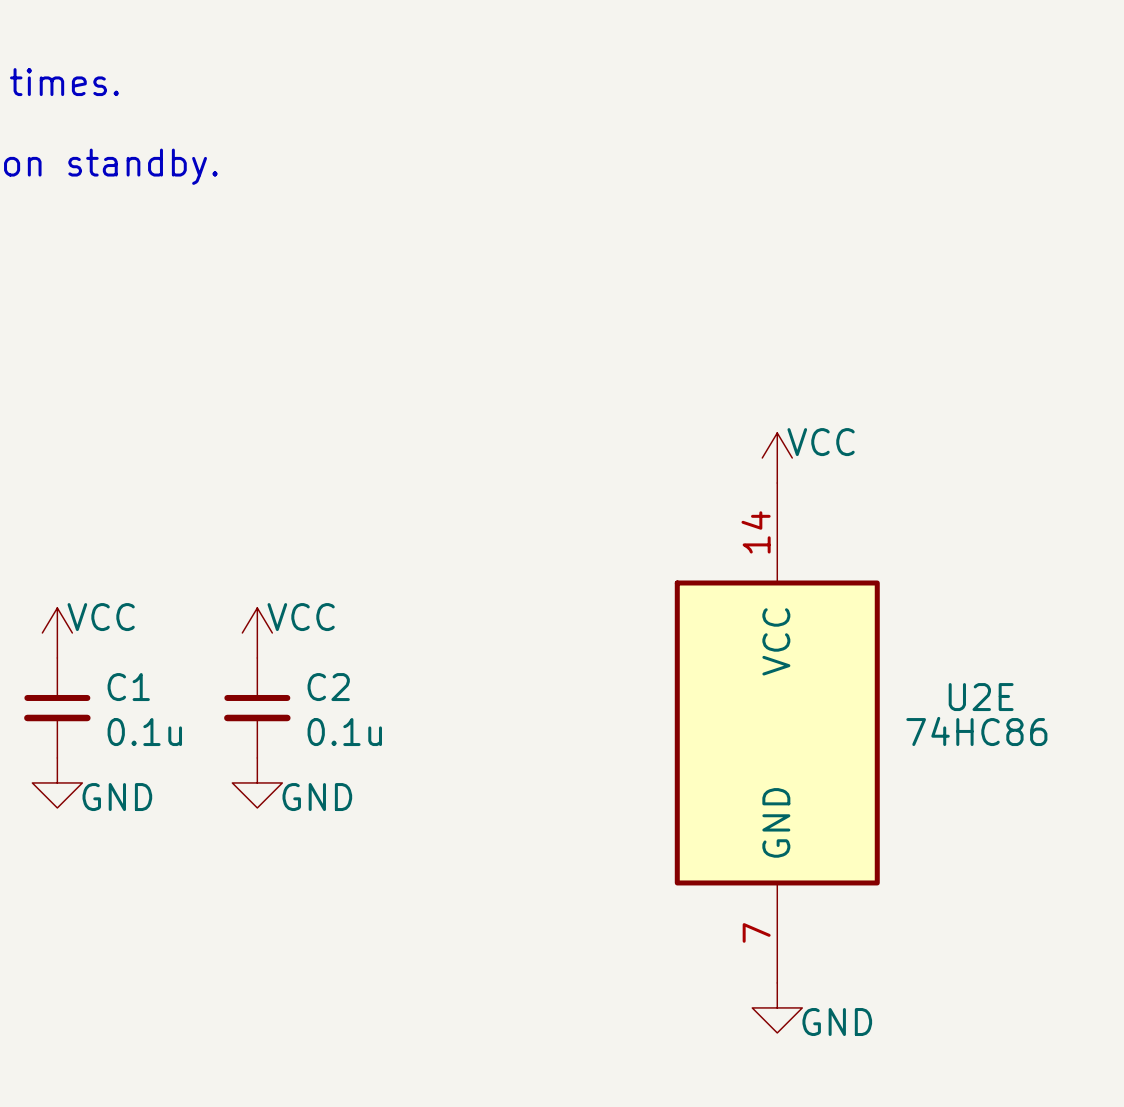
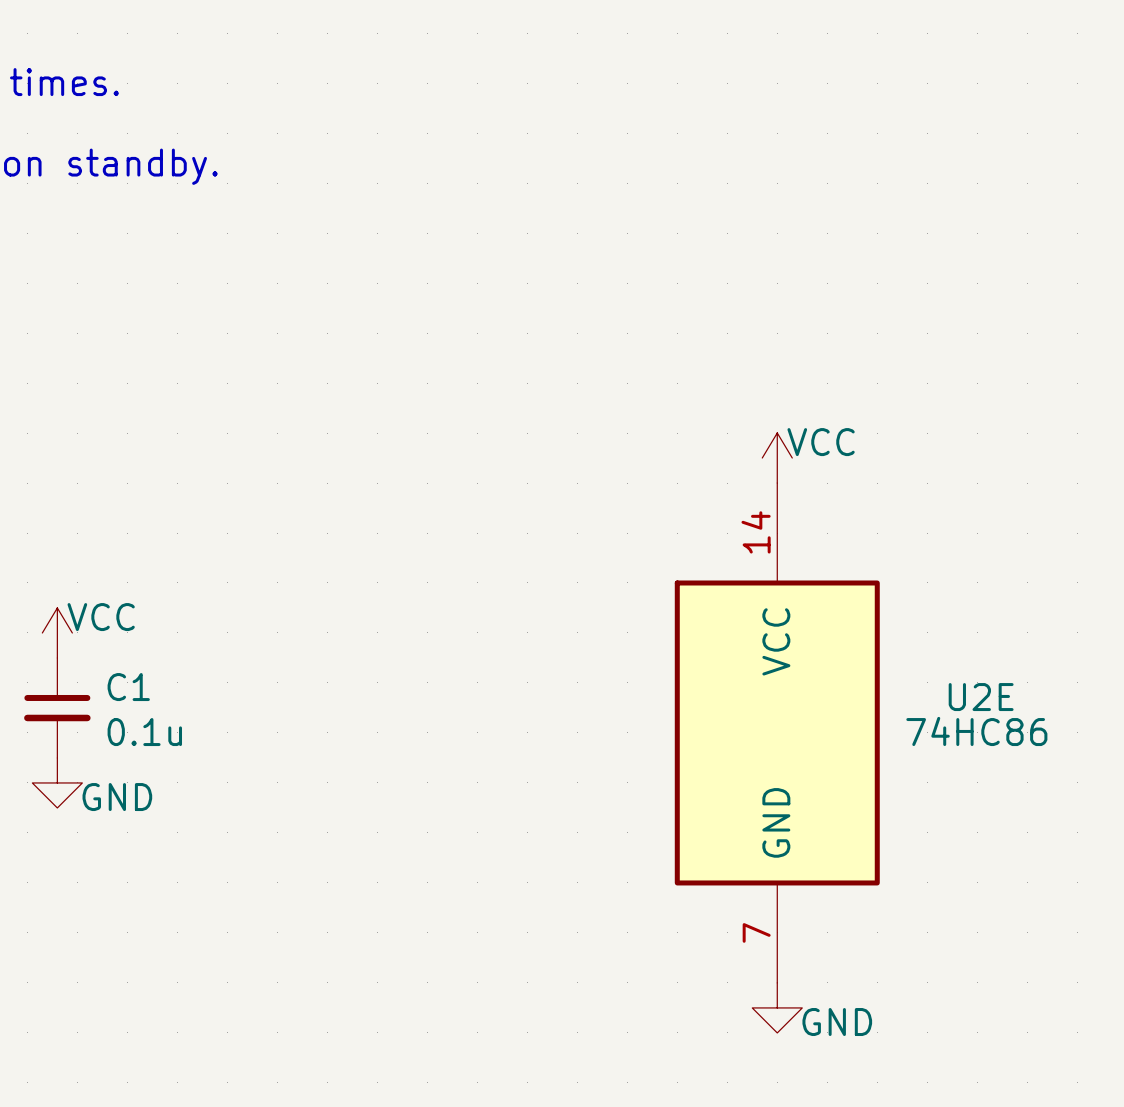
power symbol: VCC (257, 632) -> none
C2: 0.1u (257, 707) -> none
power symbol: GND (257, 782) -> none

